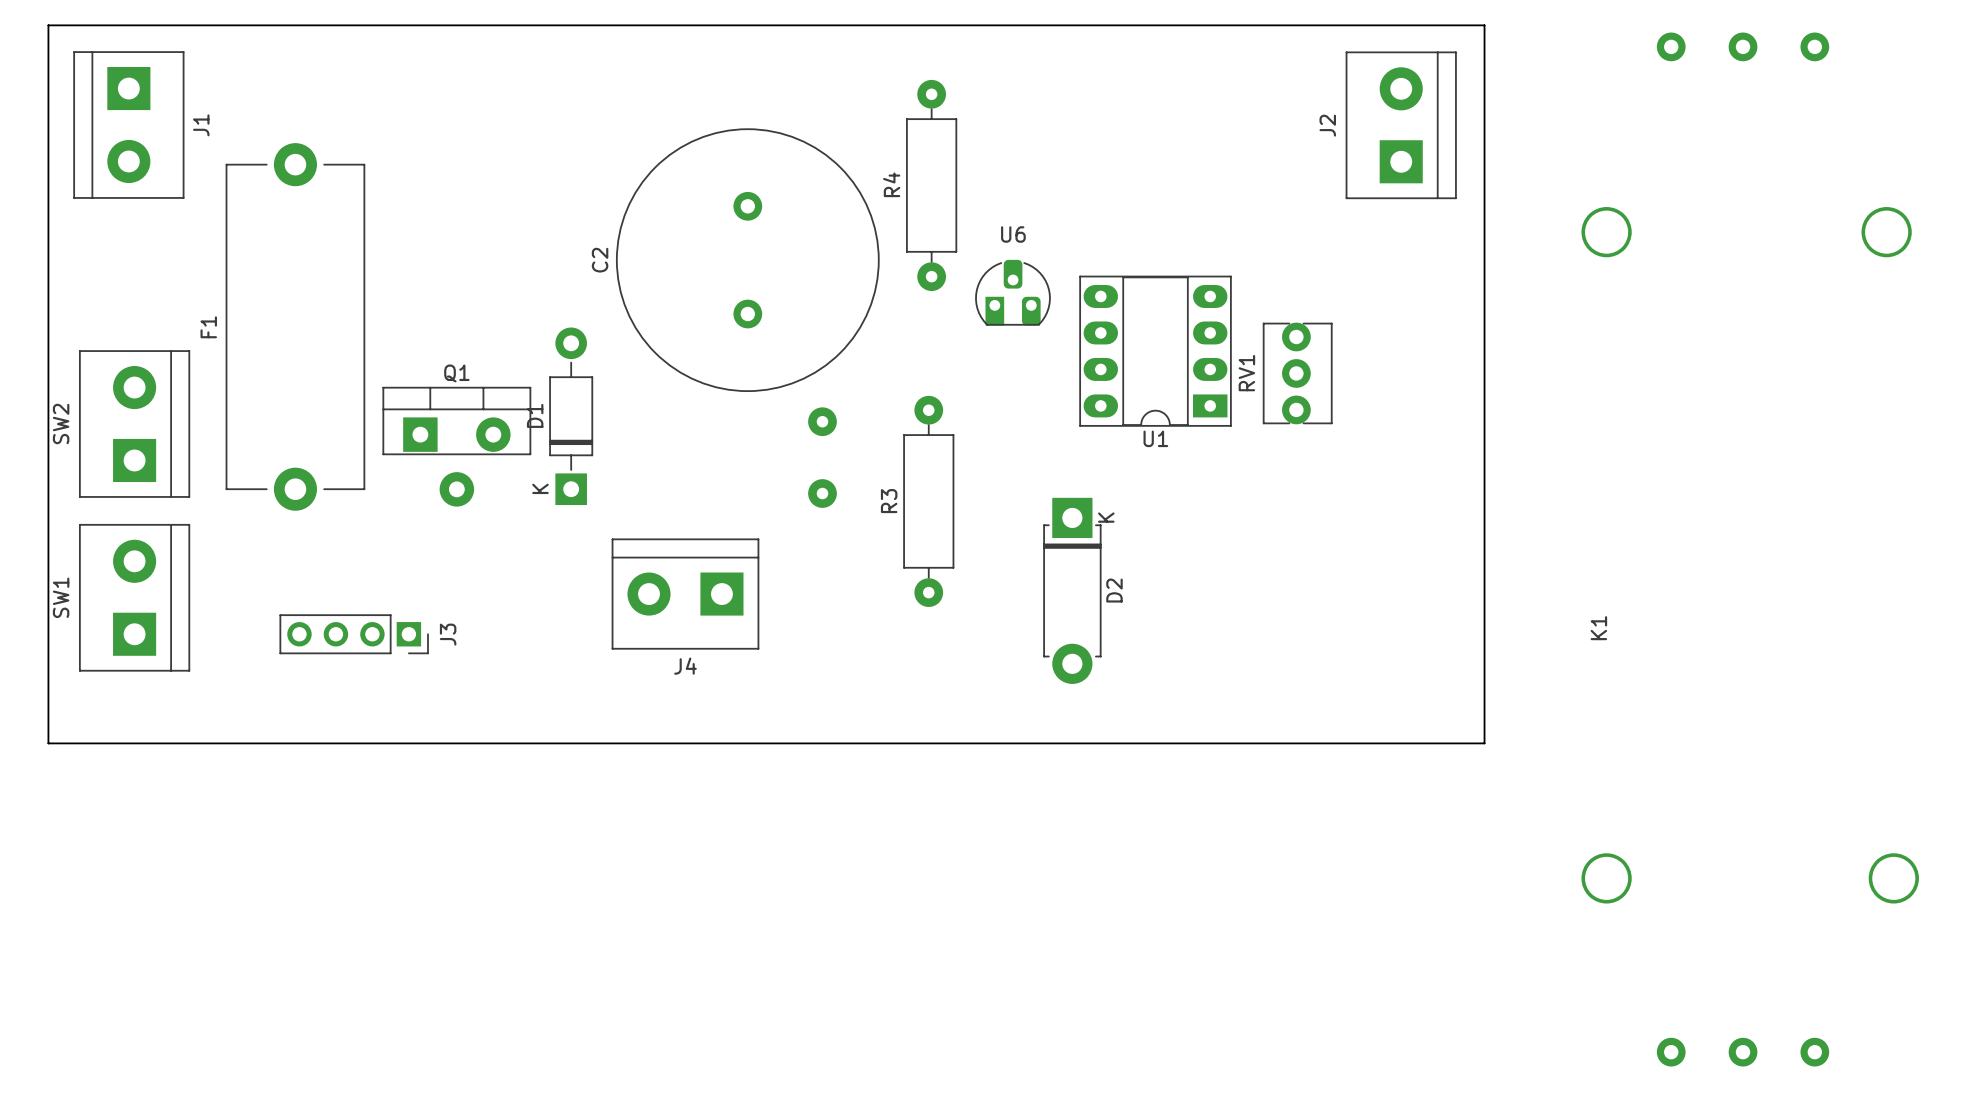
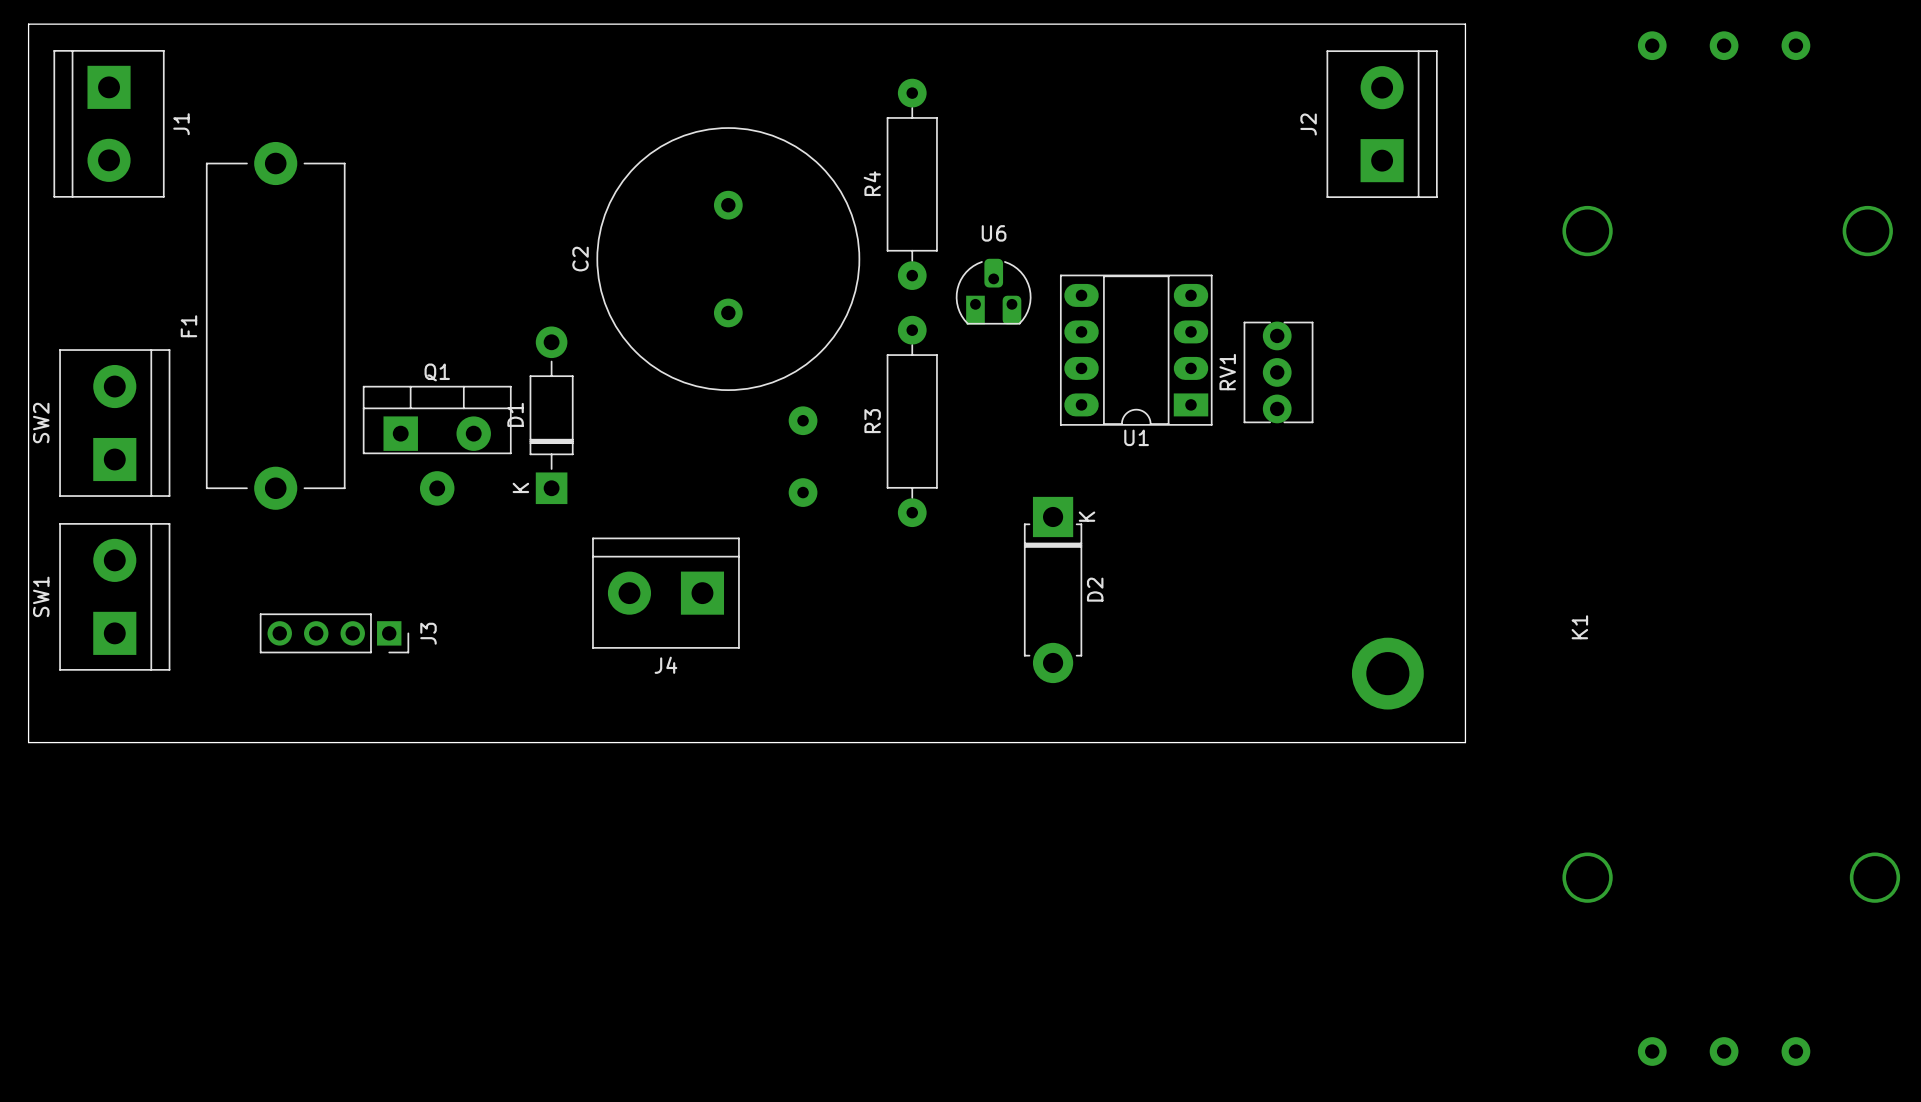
R3 position: (928, 501) -> (912, 421)
via: none -> (1387, 673)

